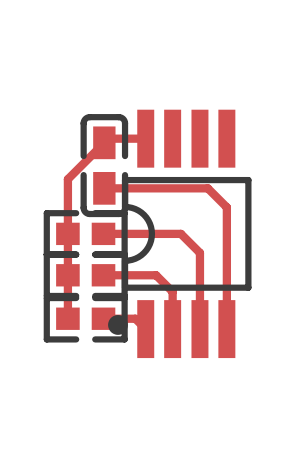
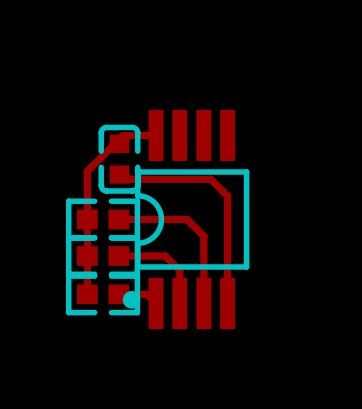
part footprint: [80, 114, 129, 218] -> [98, 124, 141, 194]

